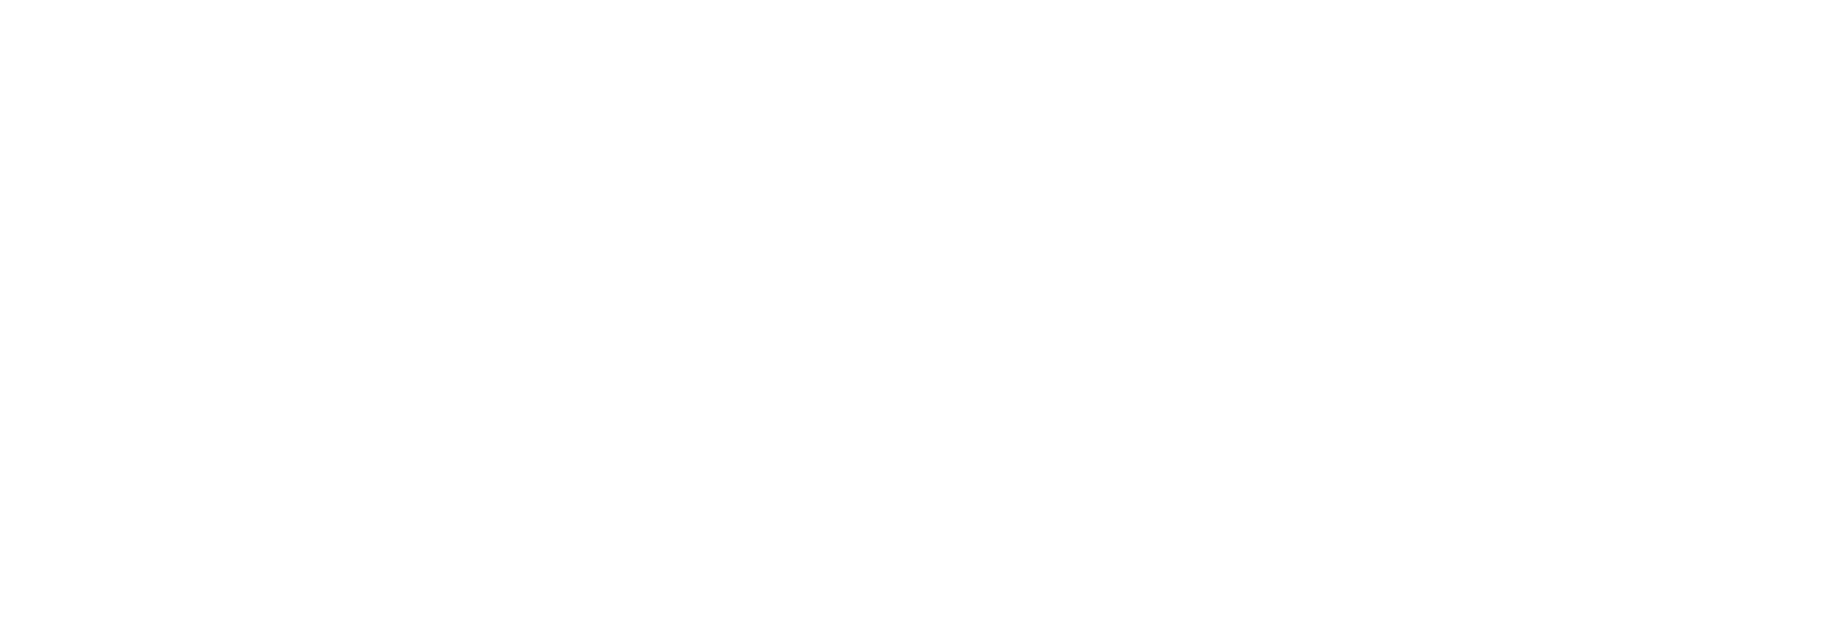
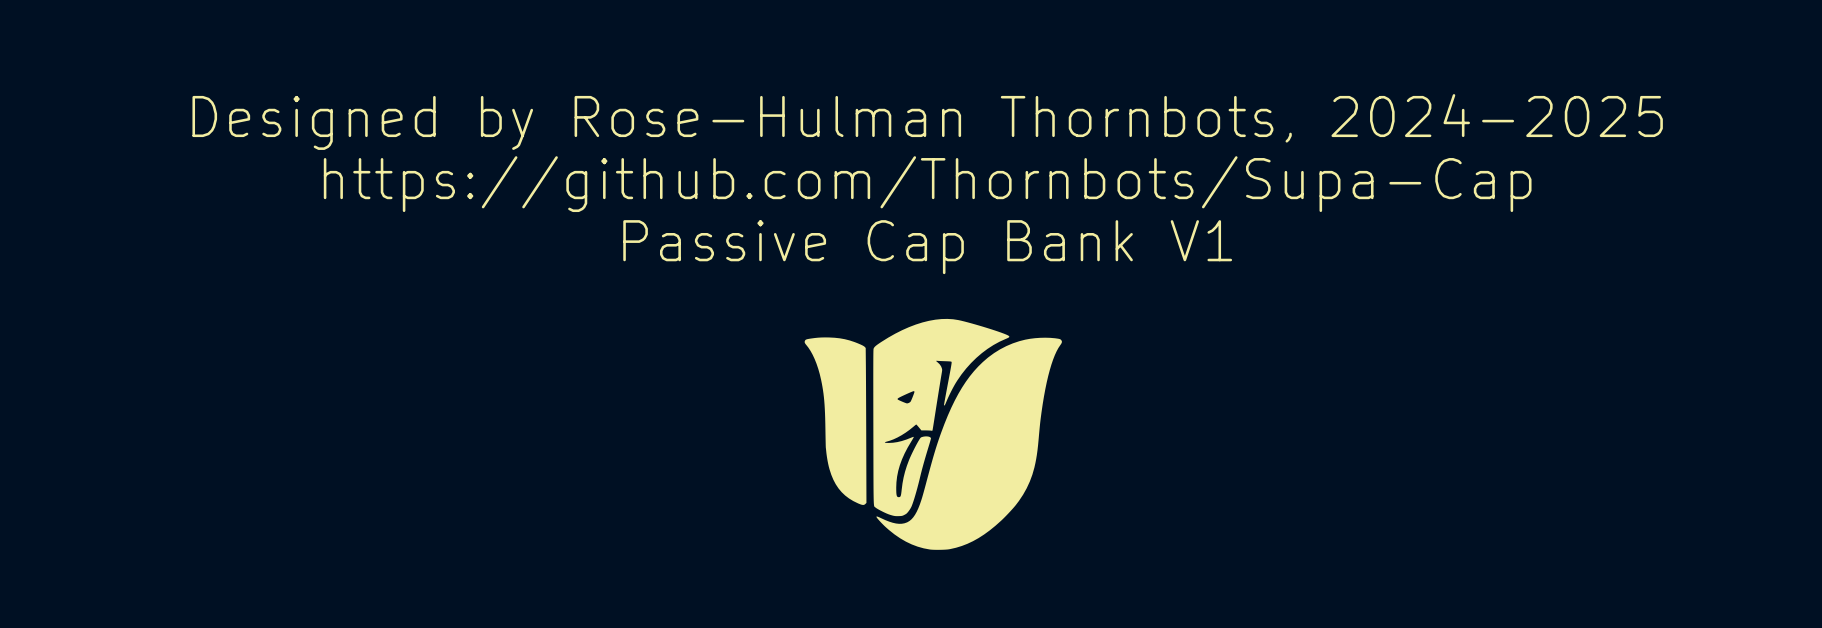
text: none -> Designed by Rose-Hulman Thornbots, 2024-2025 (927, 122)
text: none -> https://github.com/Thornbots/Supa-Cap (927, 184)
text: none -> Passive Cap Bank V1 (927, 247)
drawing: none -> [804, 318, 1062, 550]

